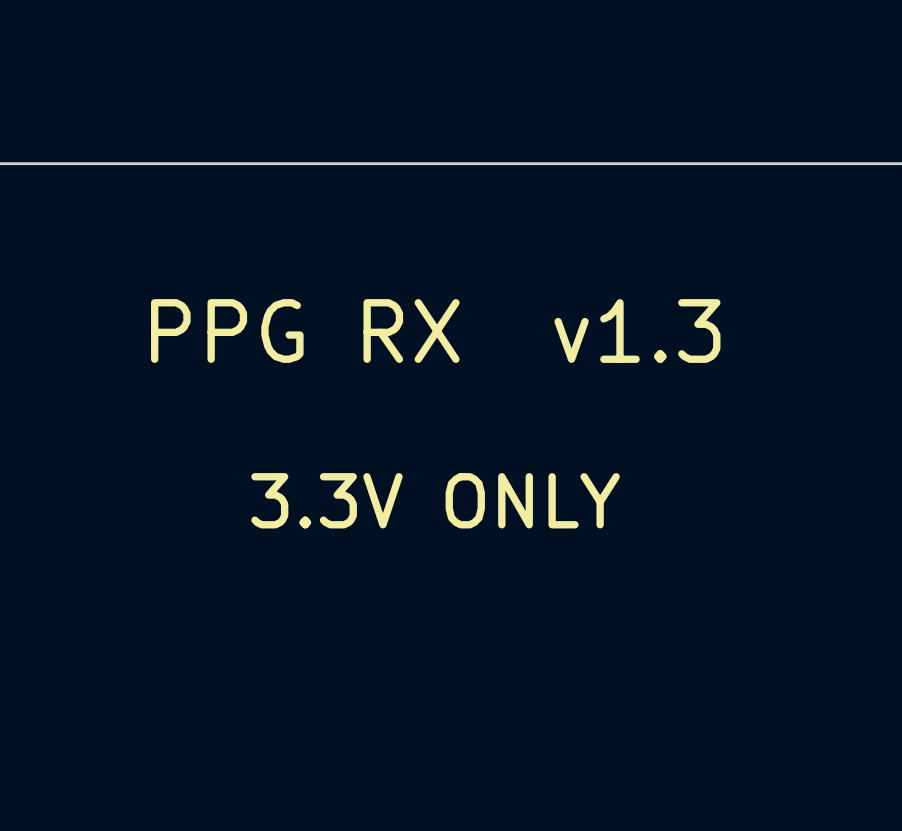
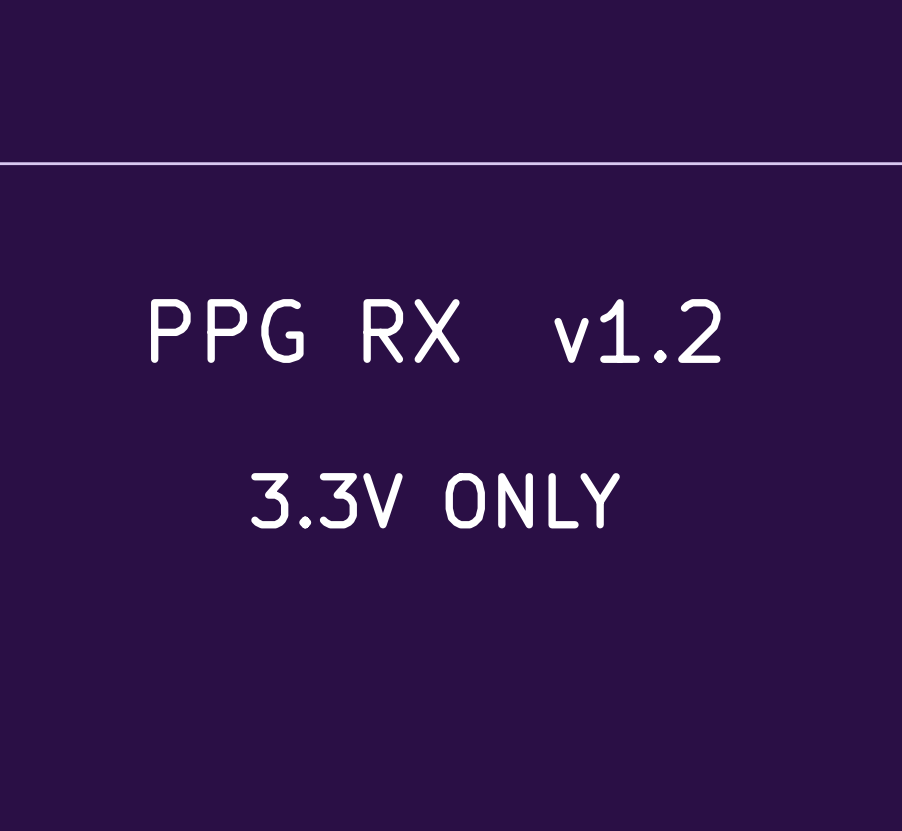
text: PPG RX v1.3 (435, 331) -> PPG RX v1.2 (435, 331)

